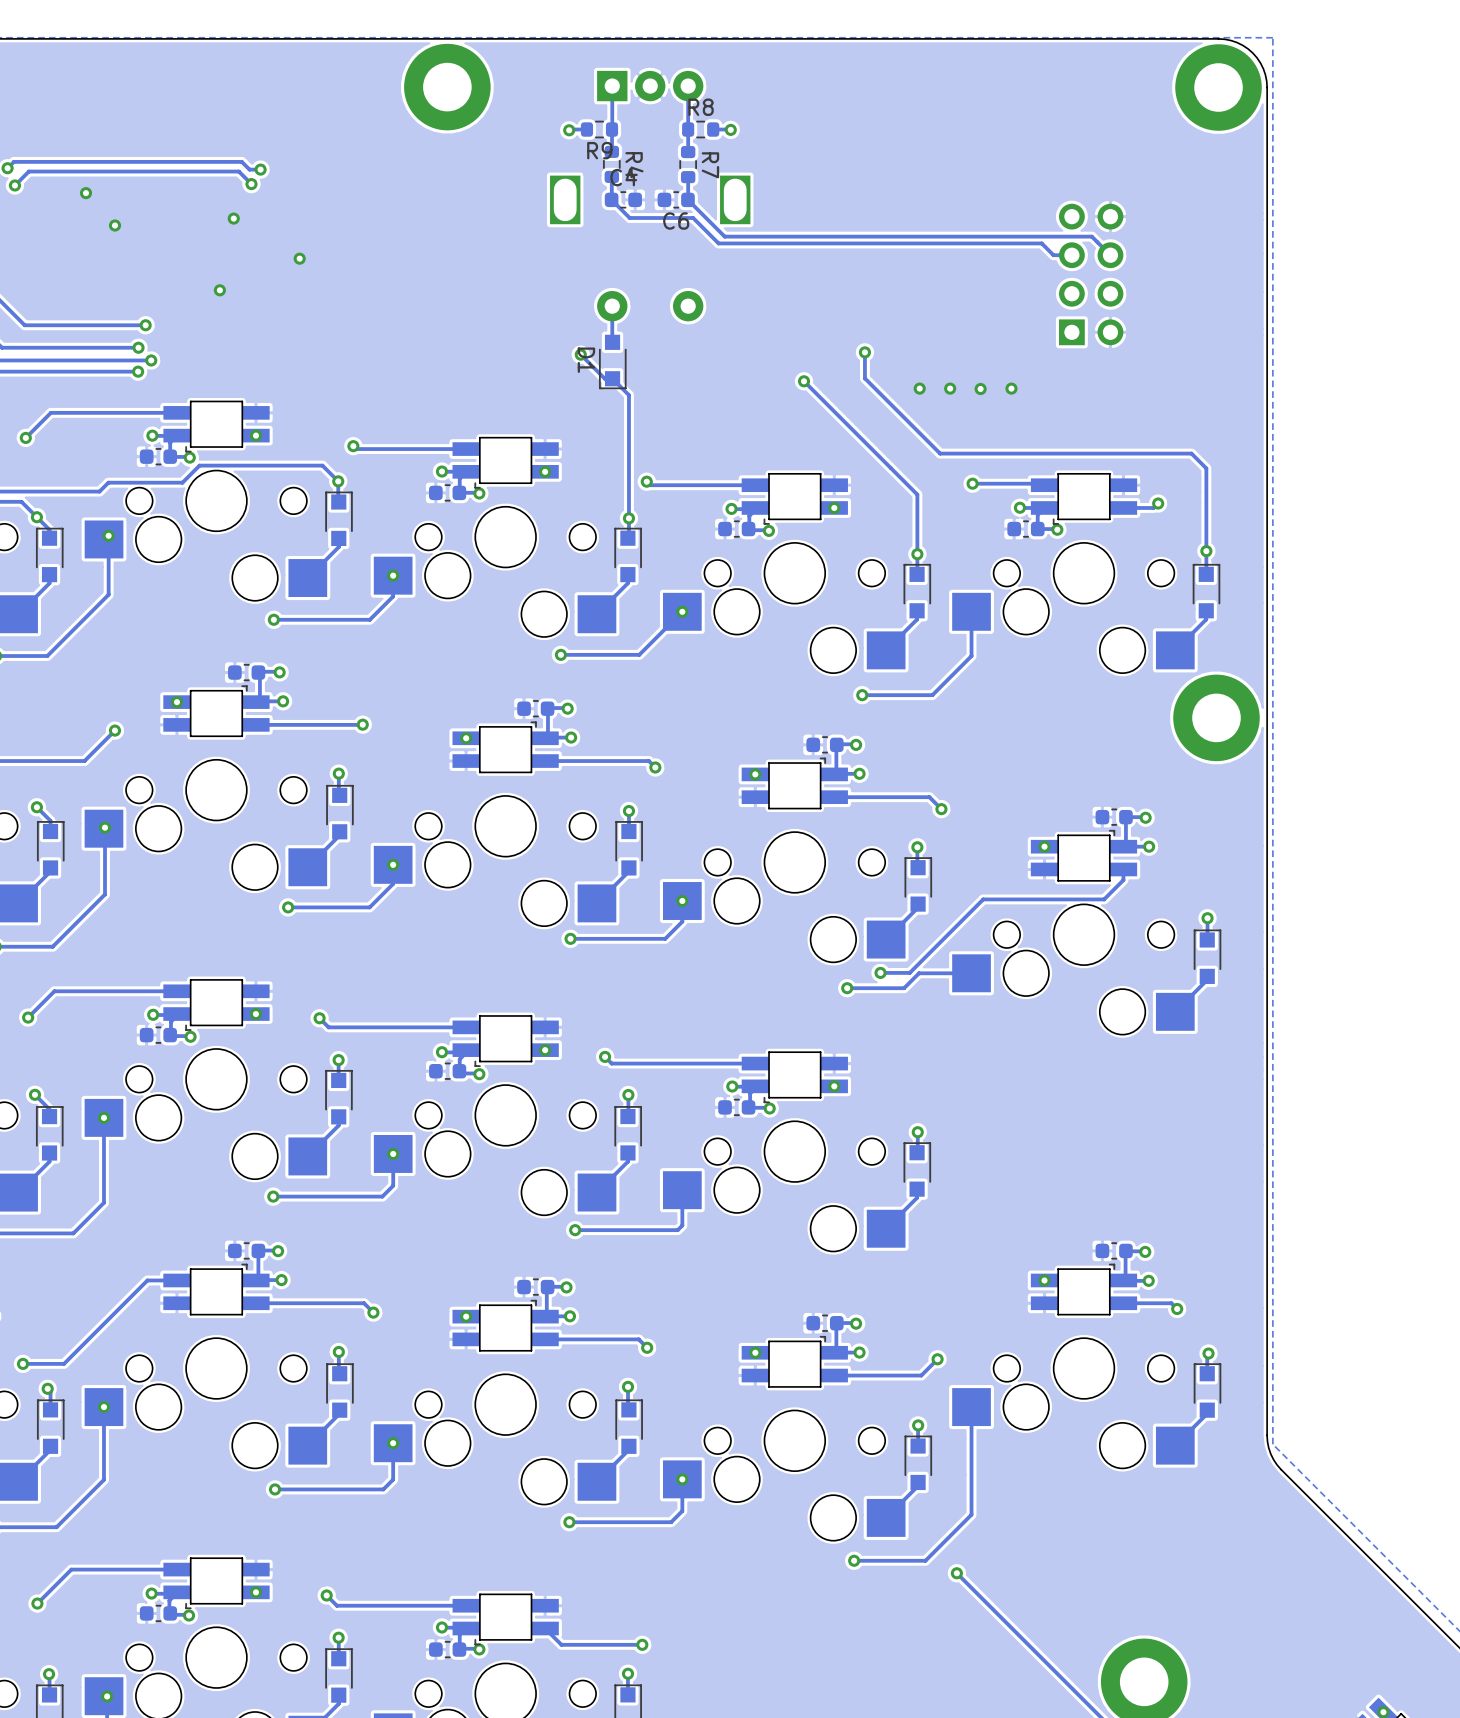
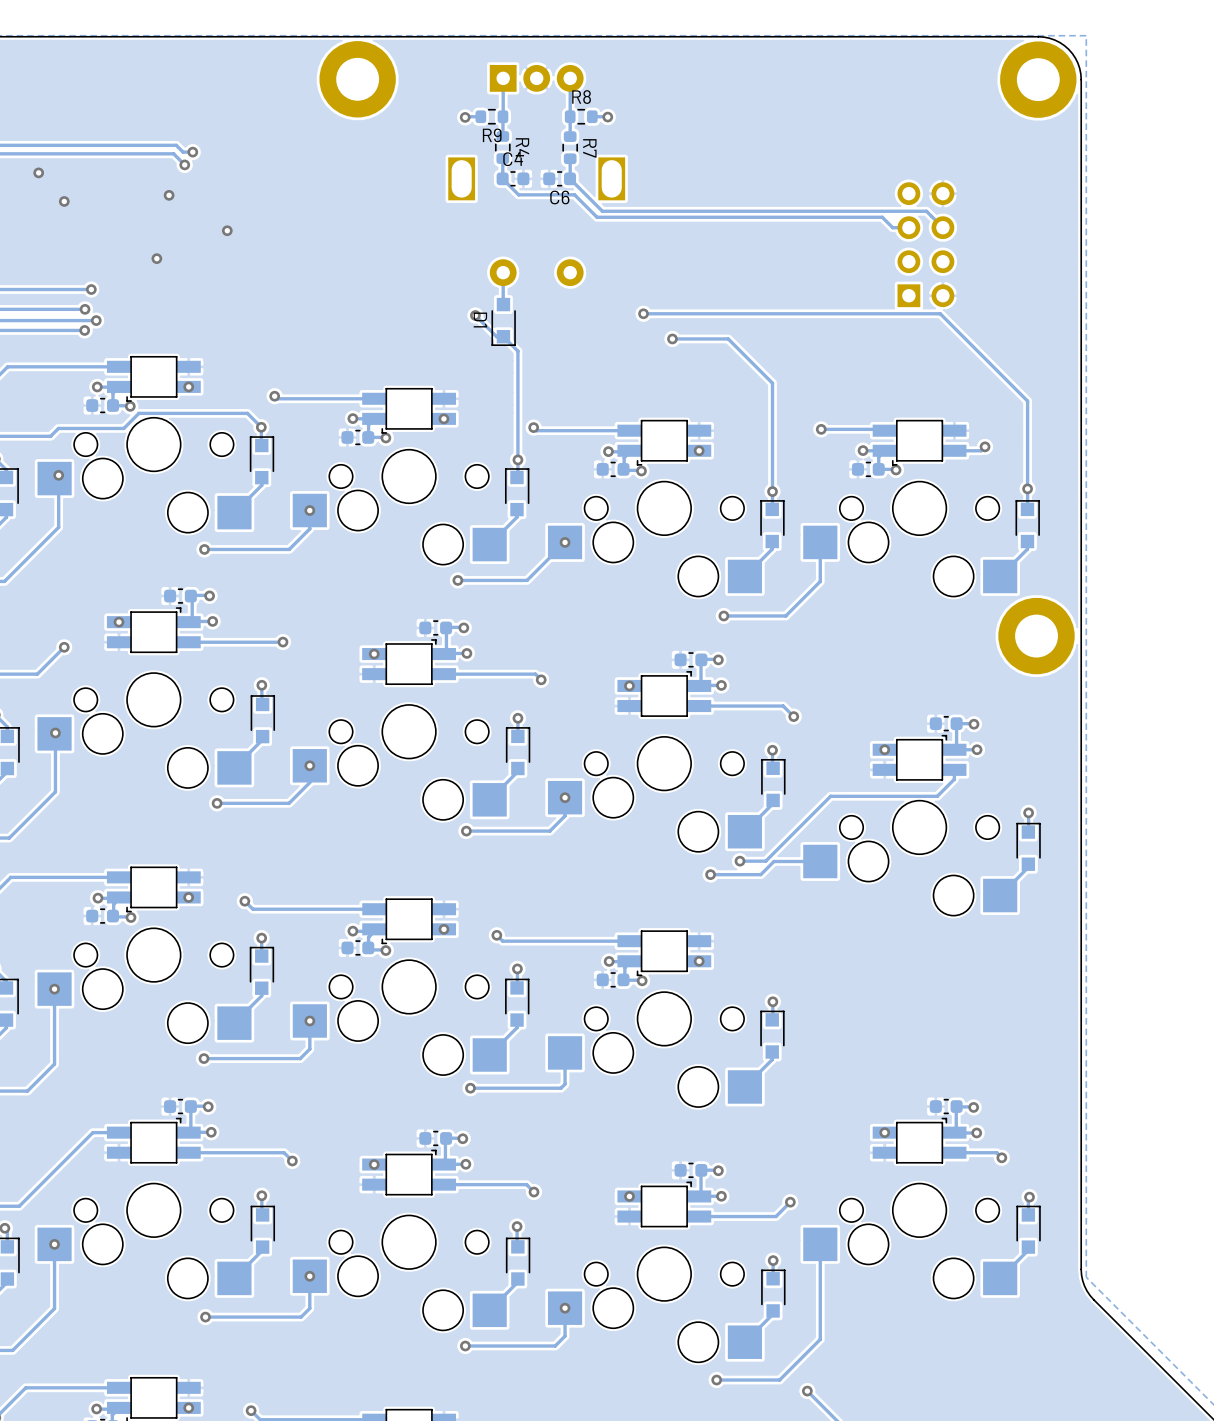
via: none -> (643, 313)
track: (864, 352) (864, 378) (940, 453) (1191, 453) (1206, 468) -> (643, 313) (940, 313) (1027, 401) (1027, 415)
via: (864, 352) -> none
track: (804, 381) (917, 494) -> (672, 338) (728, 338) (772, 383) (772, 439)
via: (919, 388) -> none
via: (950, 388) -> none
via: (1011, 388) -> none
via: (980, 389) -> none

